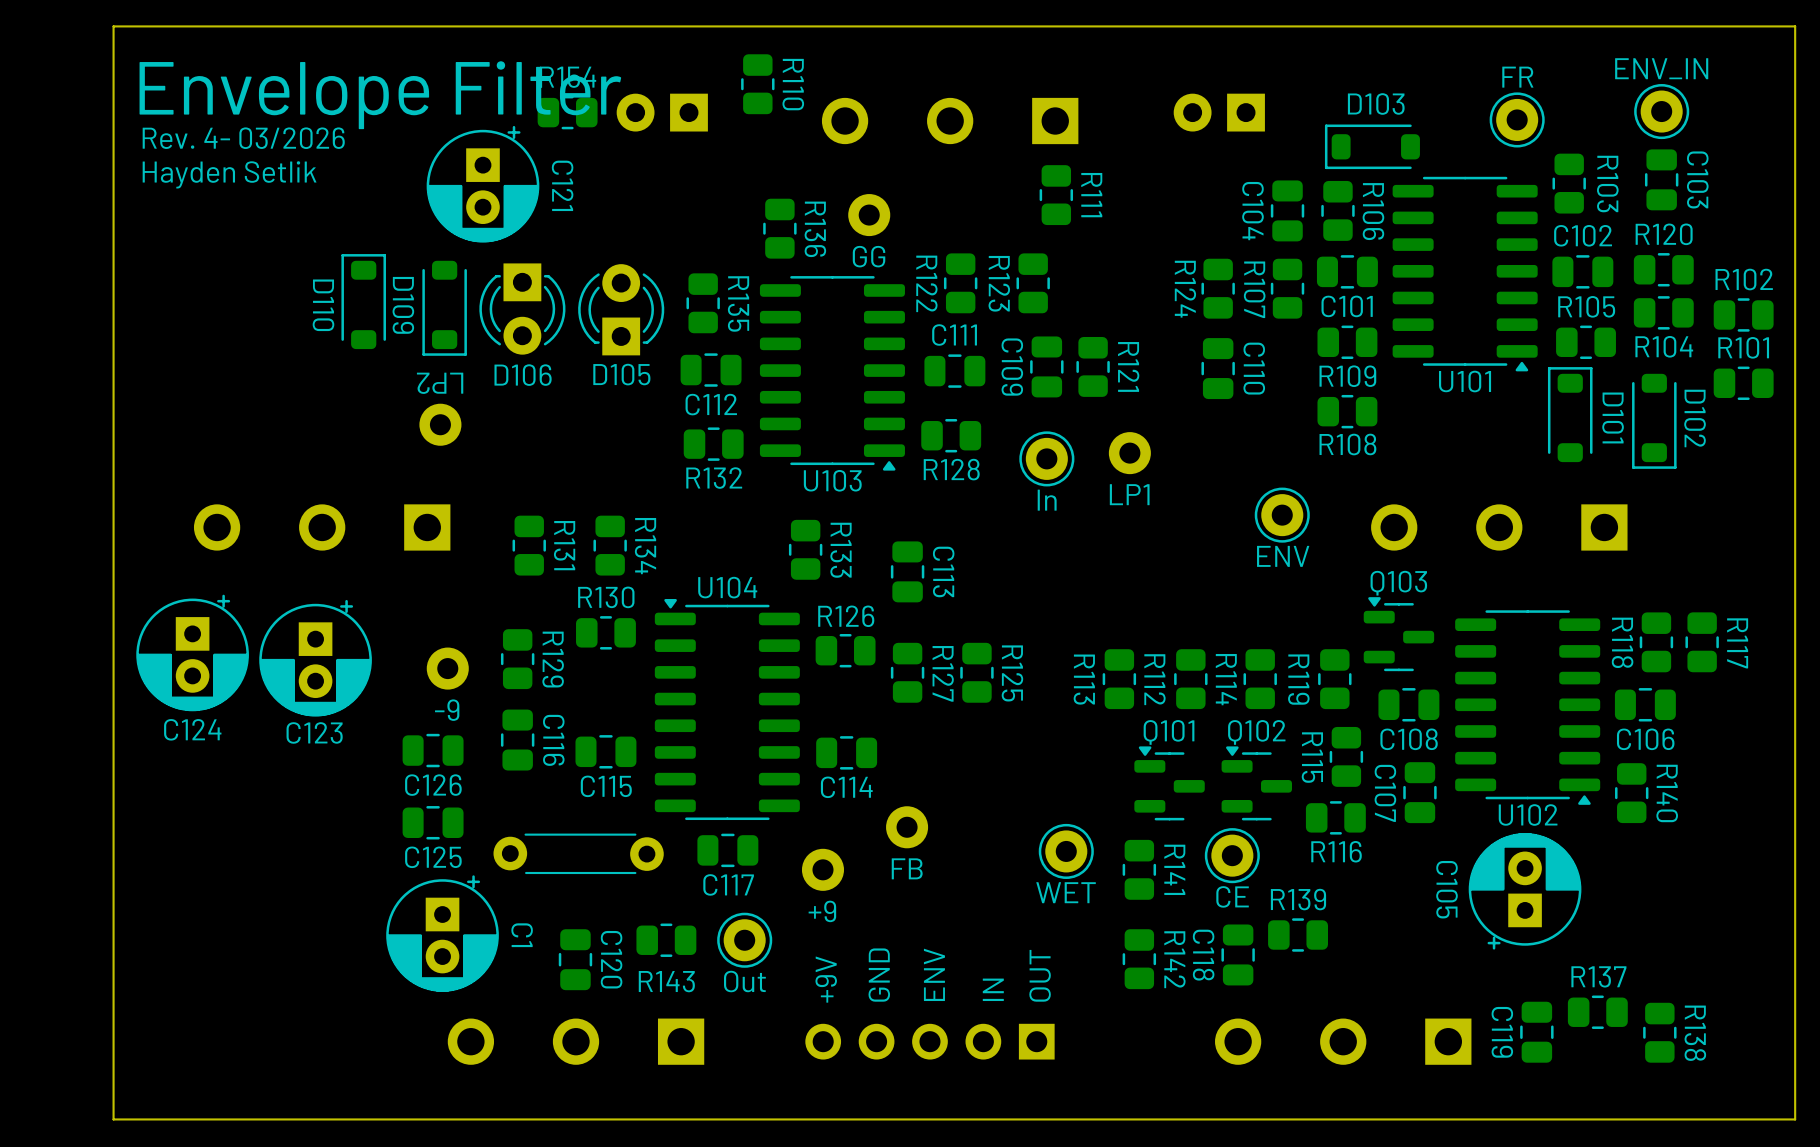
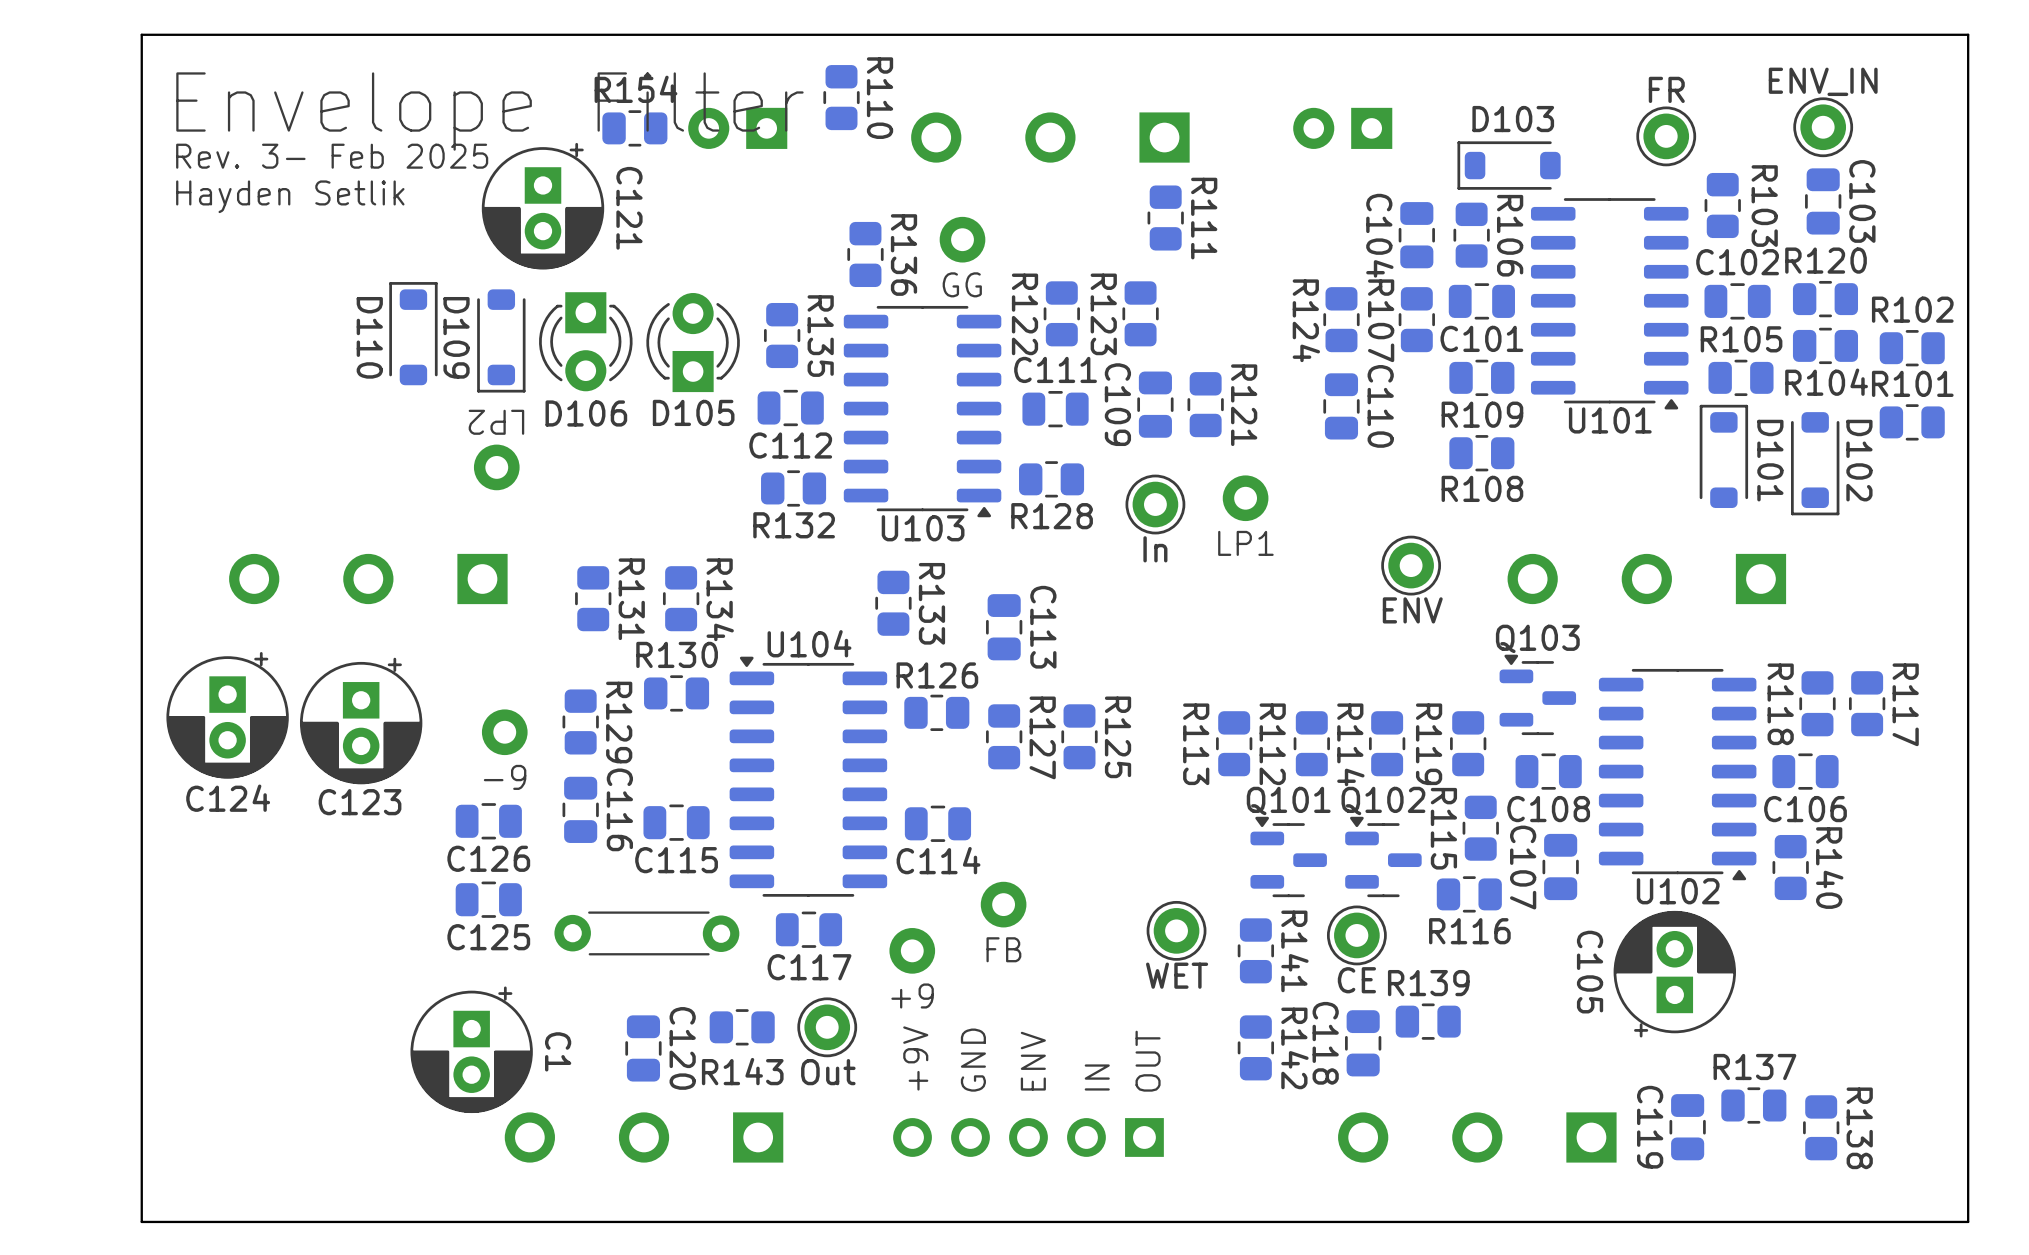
text: Rev. 4- 03/2026 (243, 138) -> Rev. 3- Feb 2025 (332, 156)
C1 position: (442, 933) -> (471, 1049)

